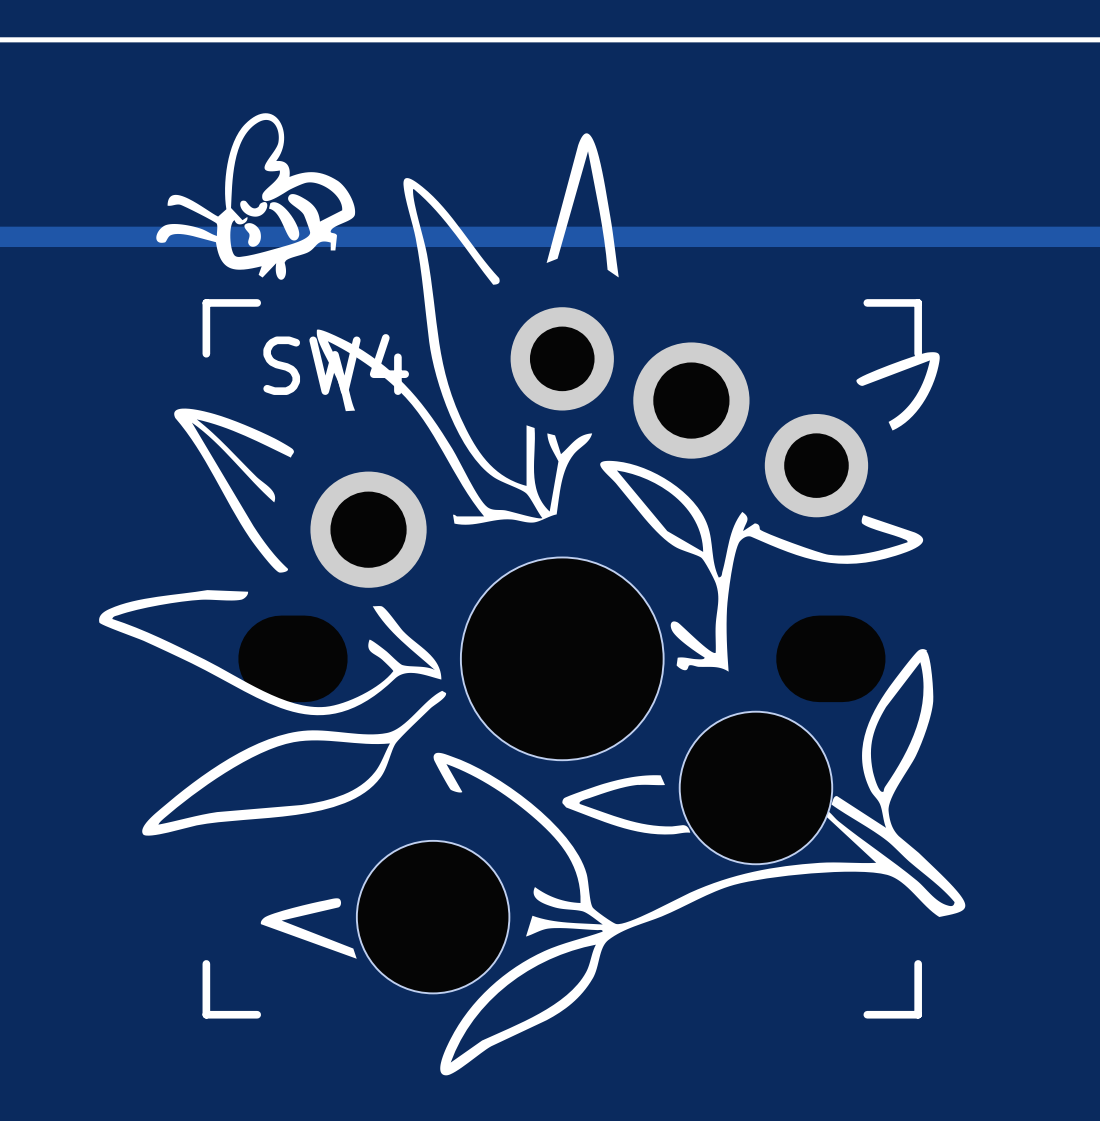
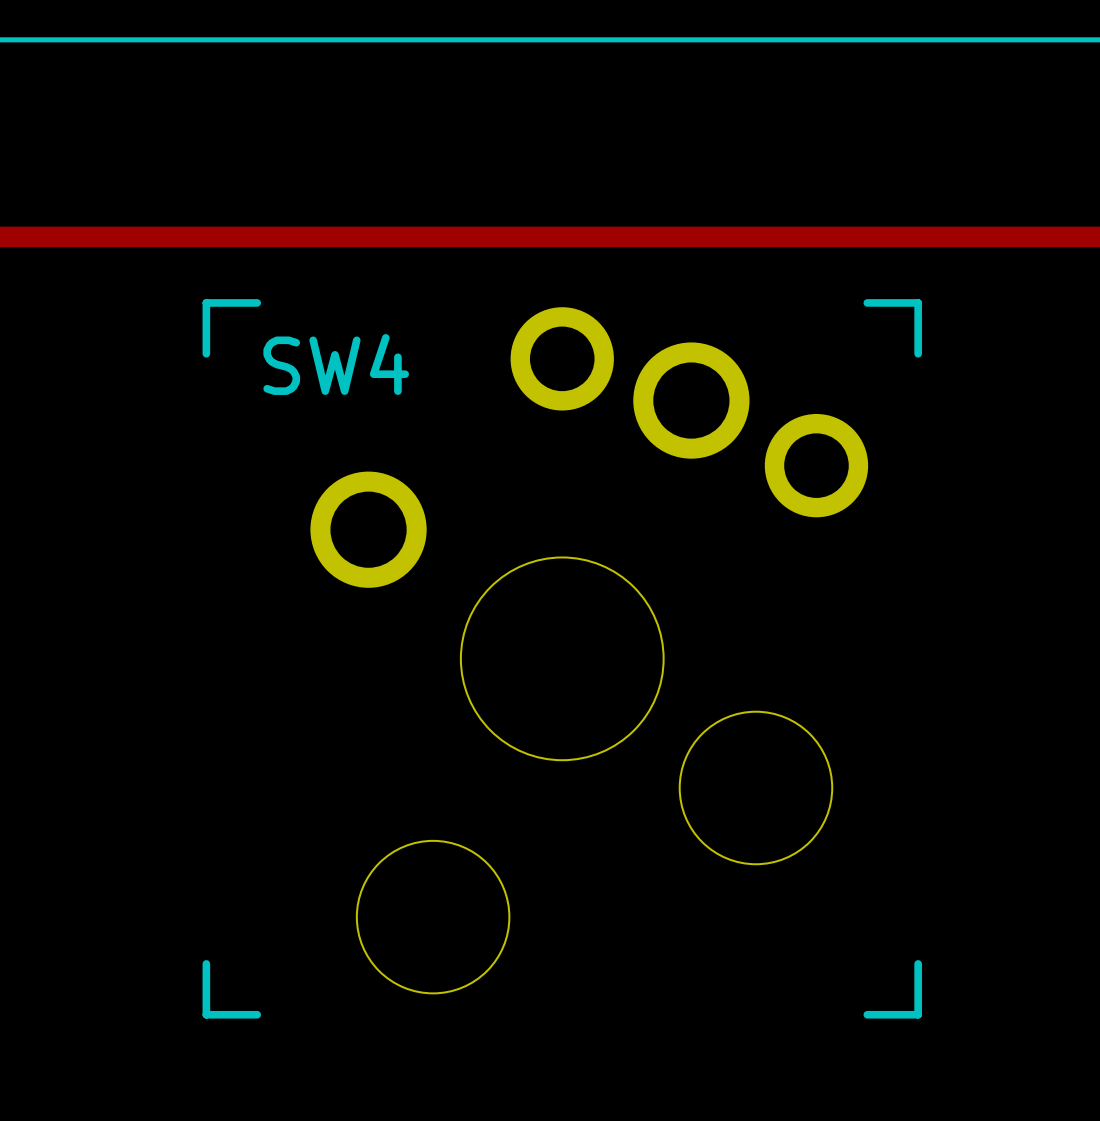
drawing: [99, 113, 966, 1076] -> none
drawing: [260, 898, 357, 959] -> none

